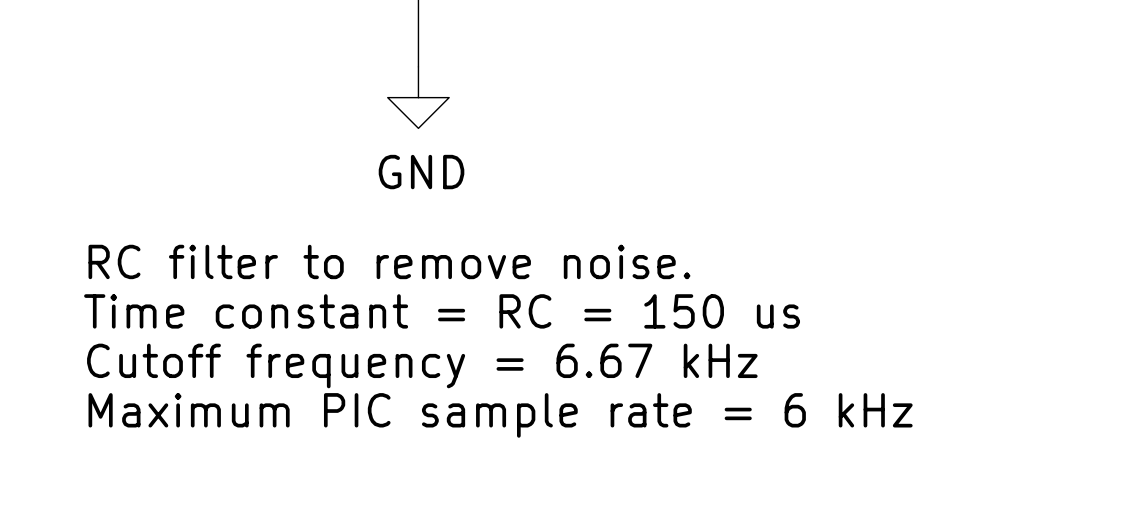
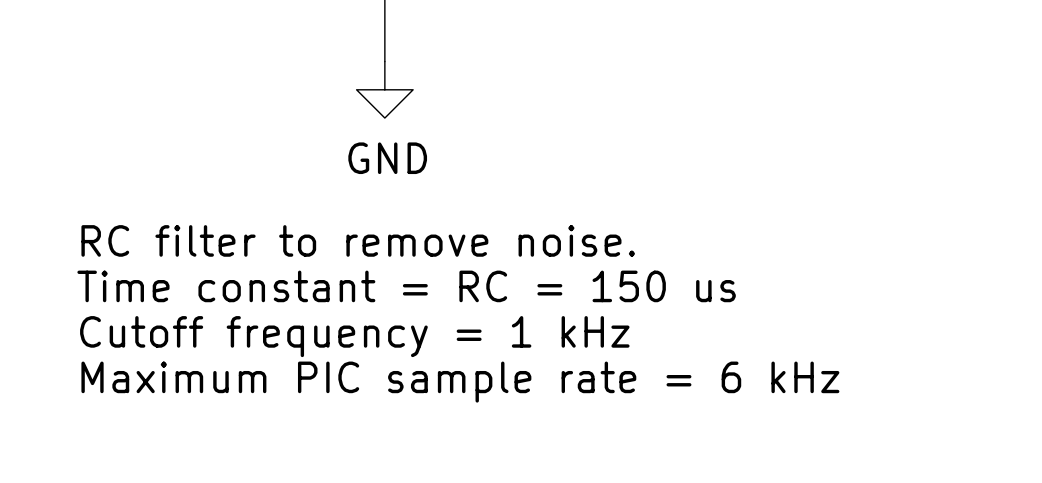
text: Cutoff frequency = 6.67 kHz (422, 365) -> Cutoff frequency = 1 kHz (354, 336)

